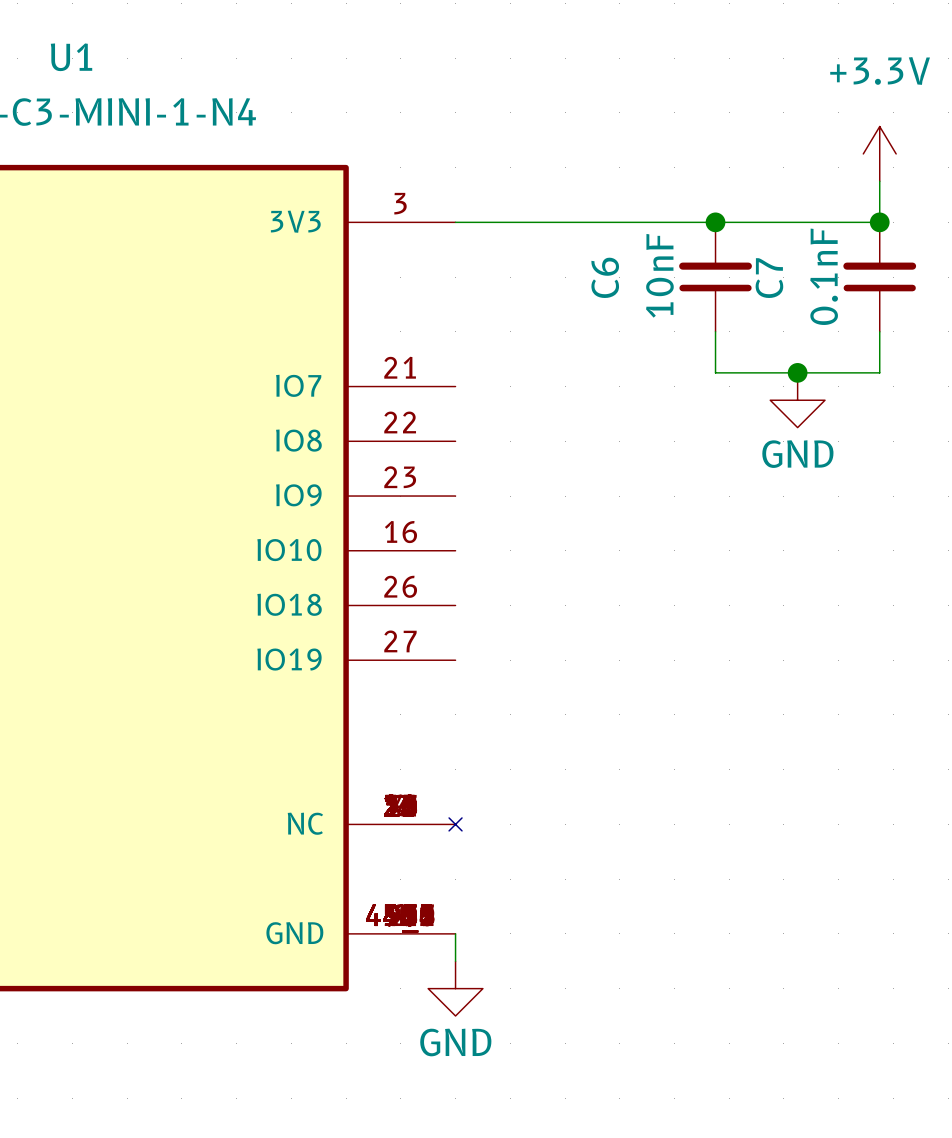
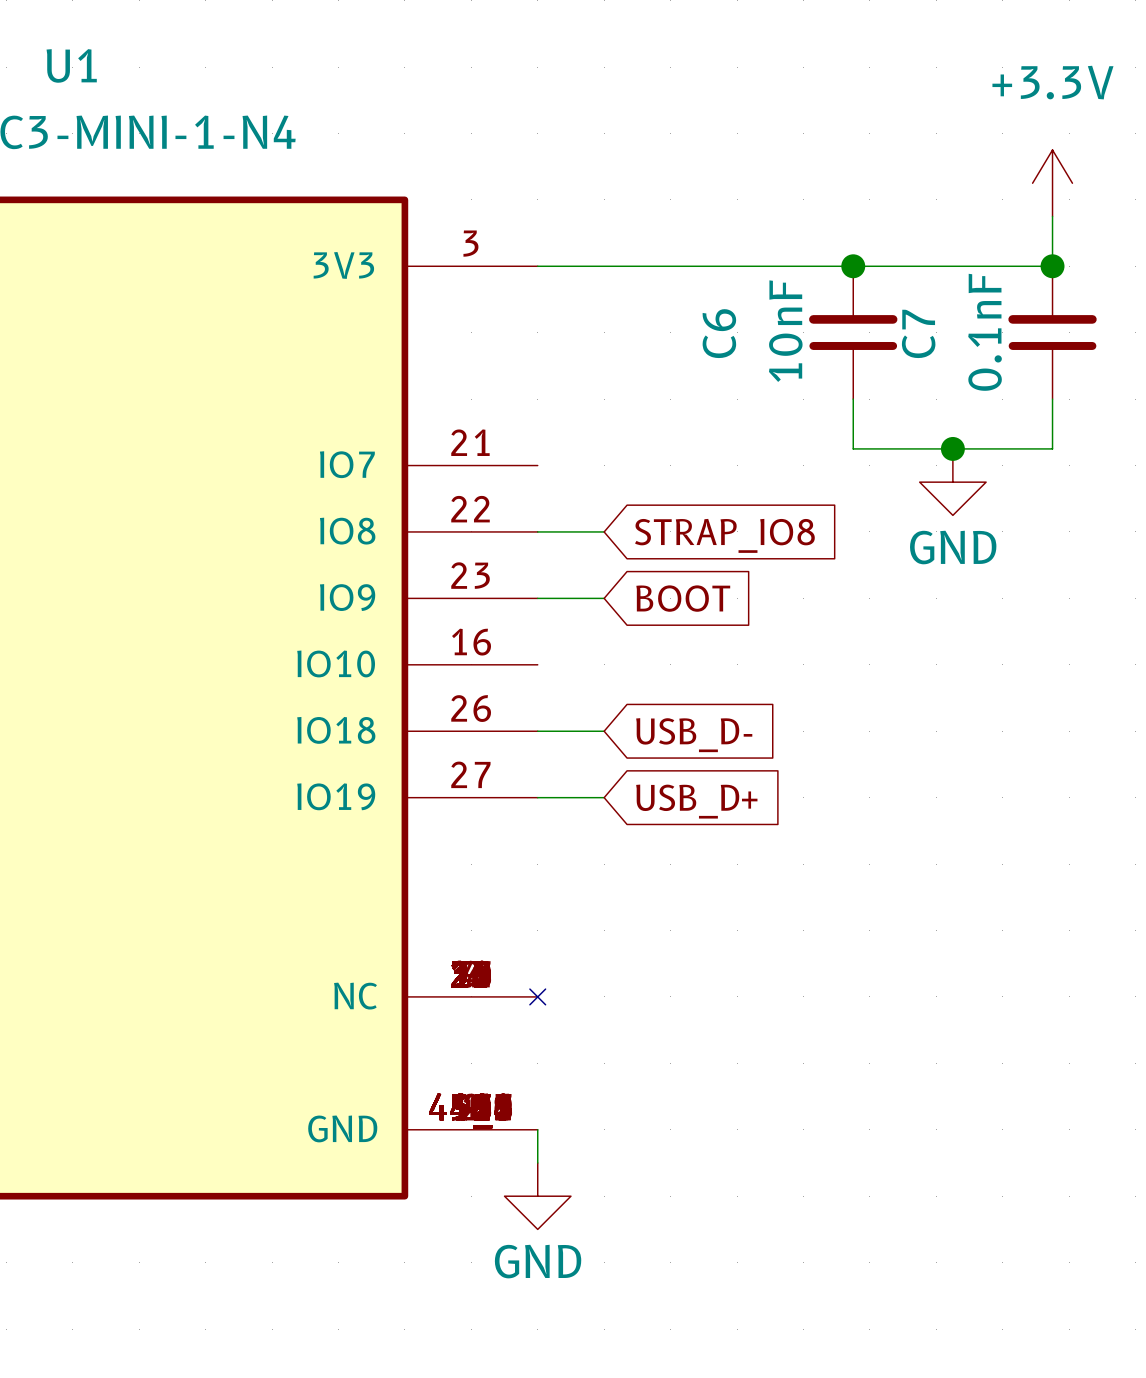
wire: none -> (537, 531) (604, 531)
global label: none -> STRAP_IO8 (724, 535)
wire: none -> (537, 598) (604, 598)
global label: none -> BOOT (683, 598)
wire: none -> (537, 731) (604, 731)
global label: none -> USB_D- (694, 735)
wire: none -> (537, 797) (604, 797)
global label: none -> USB_D+ (696, 801)

